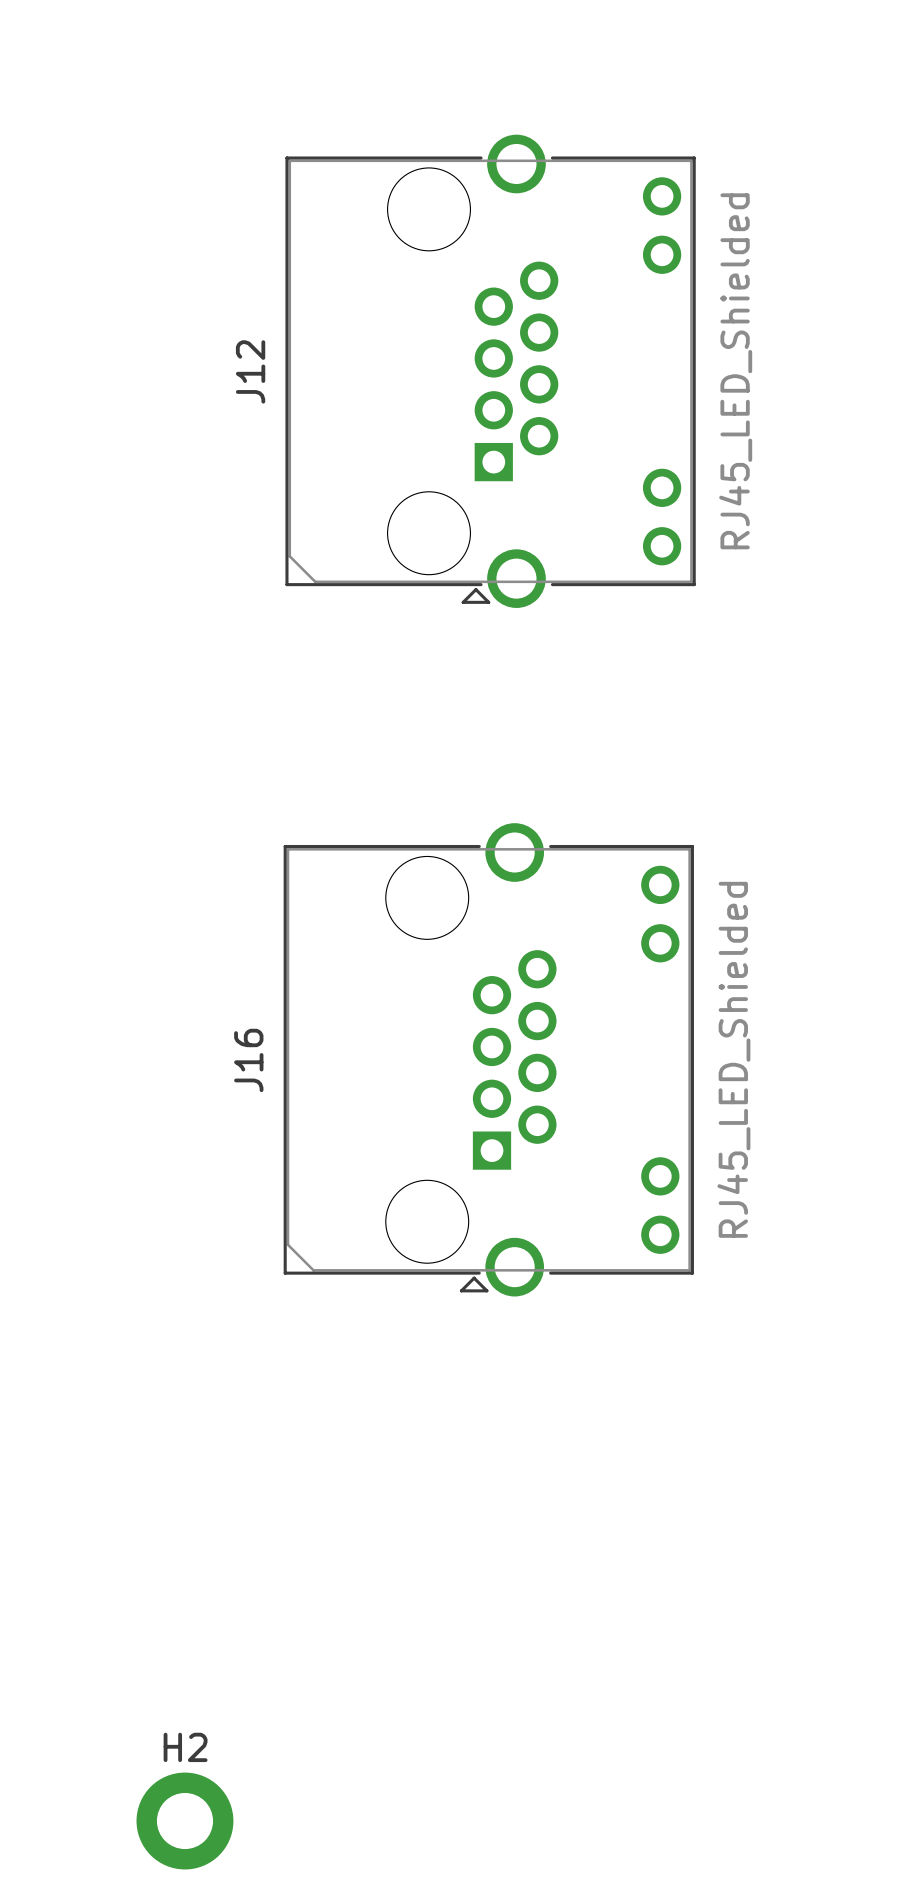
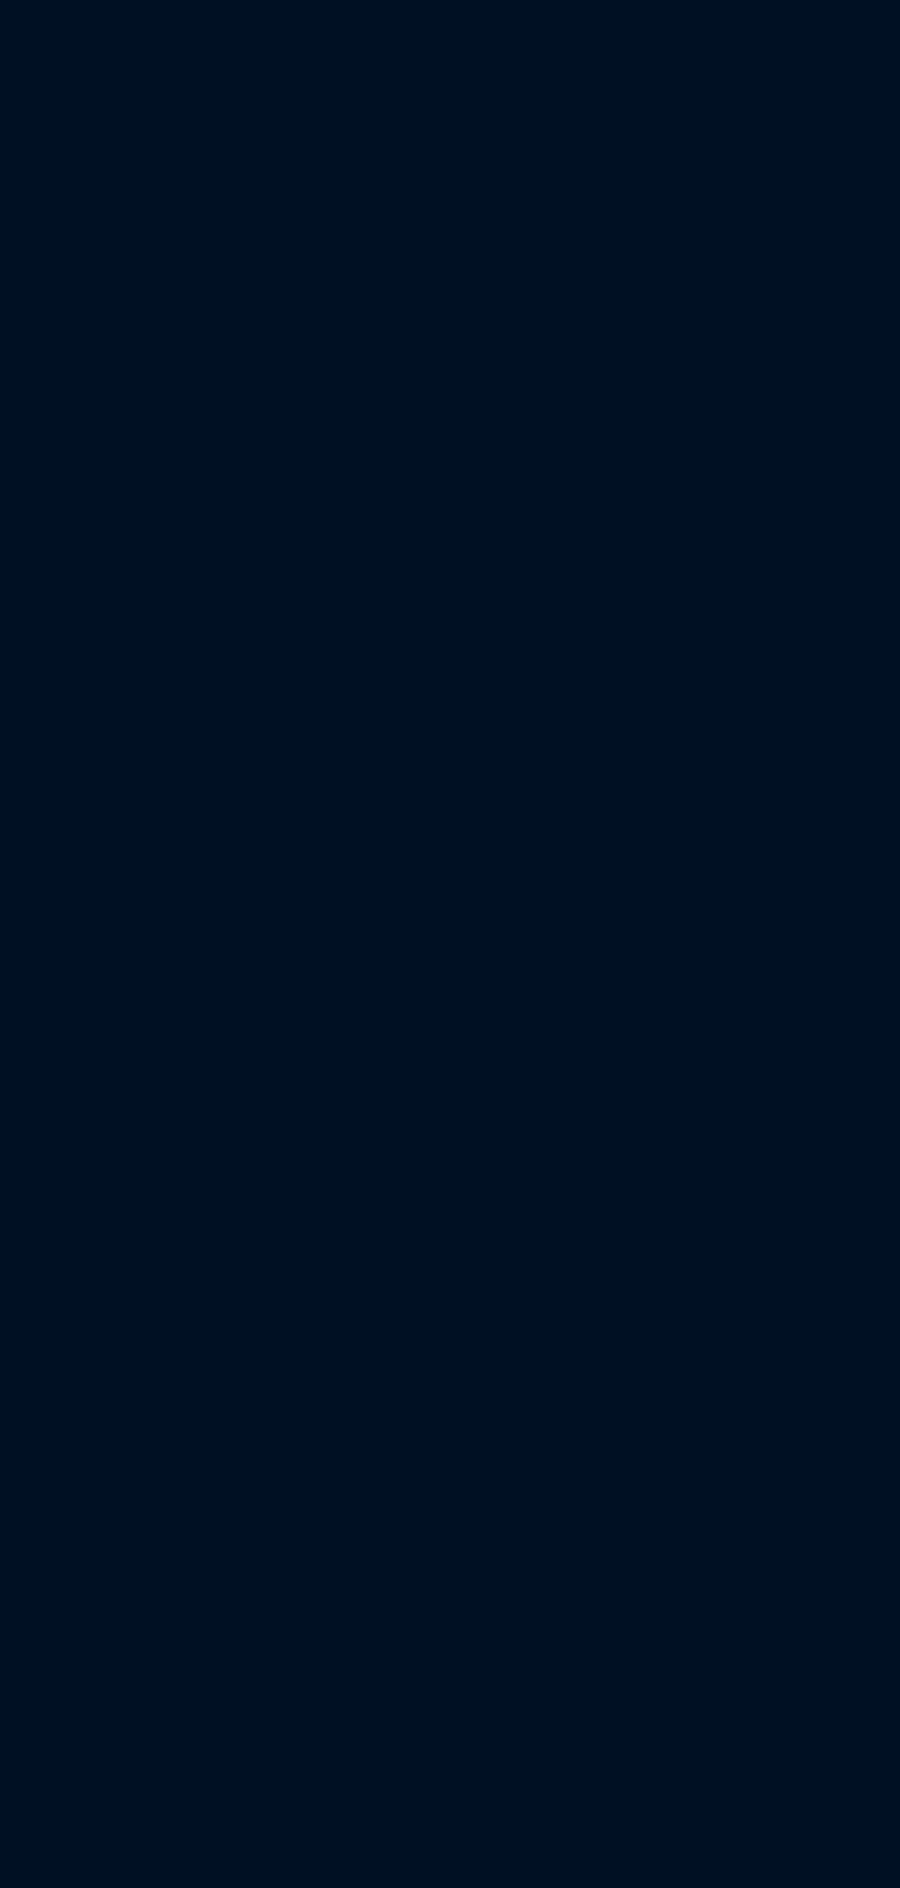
J12: RJ45_LED_Shielded (490, 371) -> none
J16: RJ45_LED_Shielded (488, 1059) -> none
H2: (184, 1821) -> none

